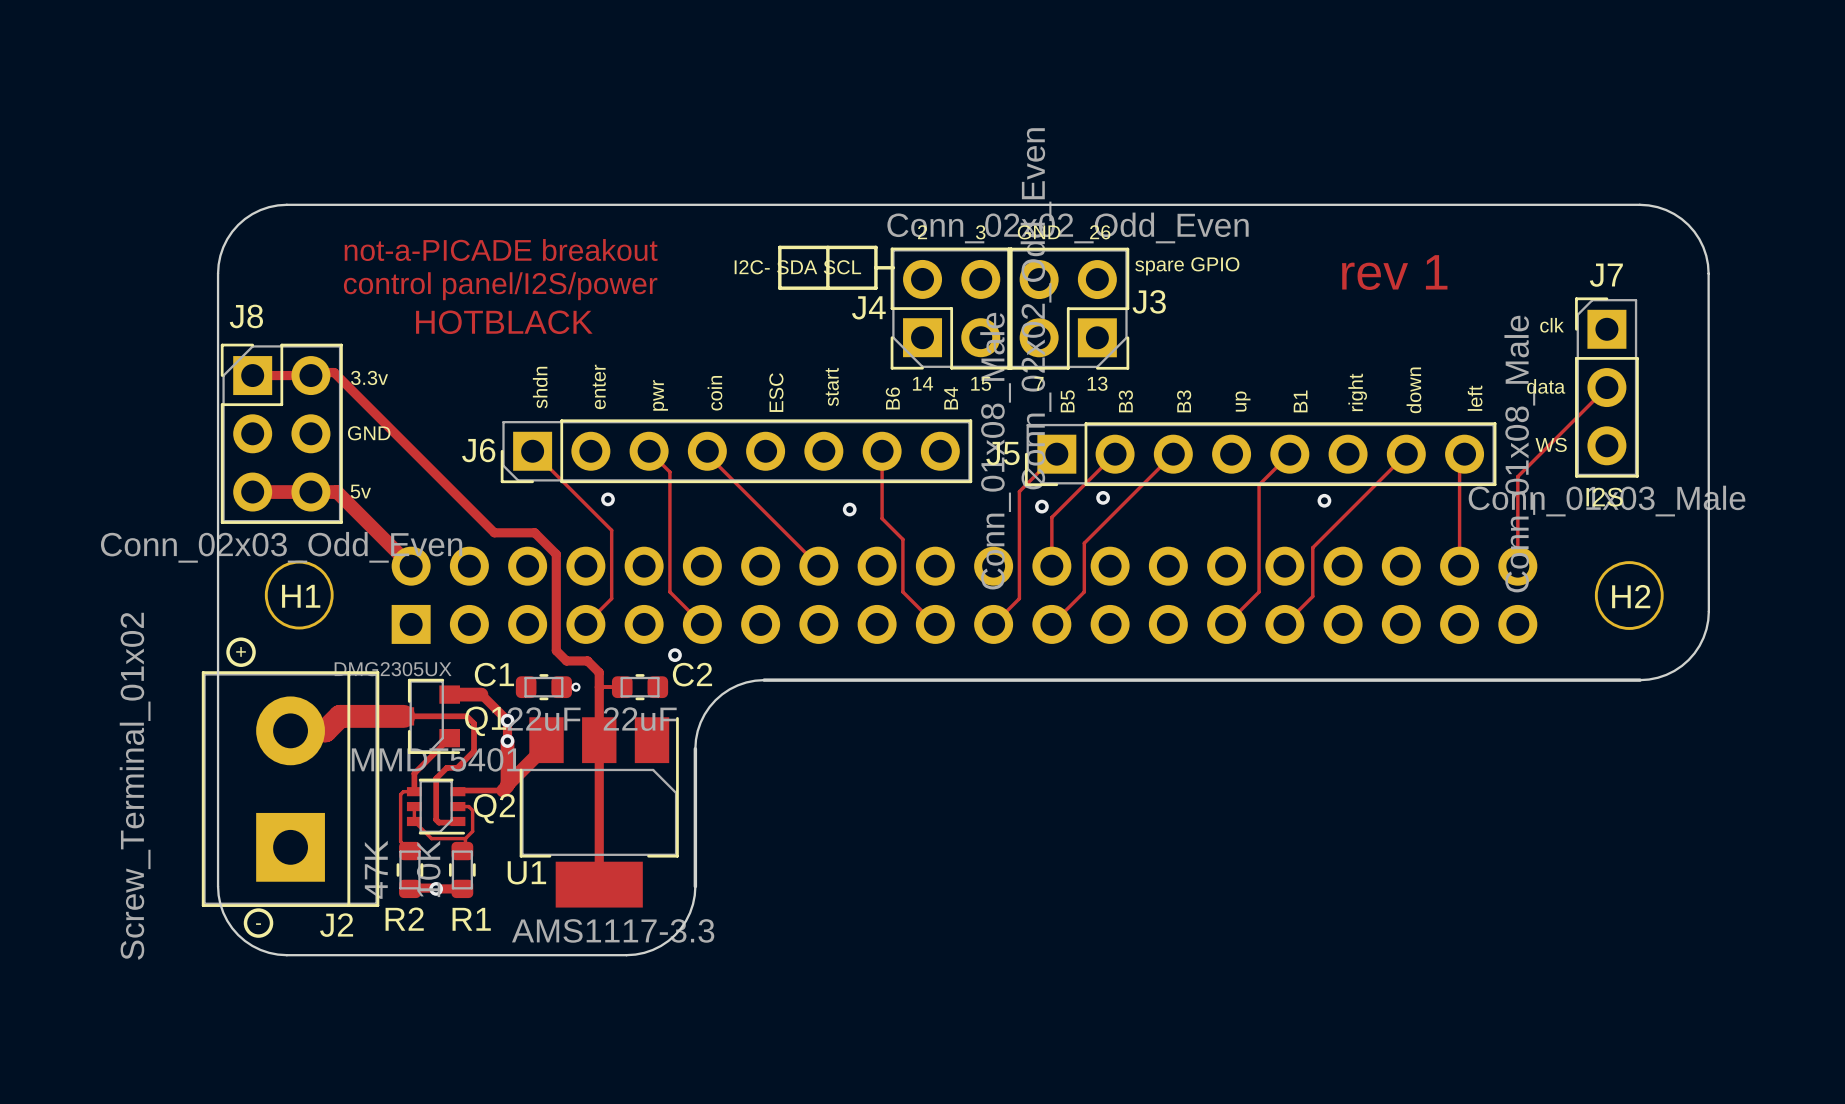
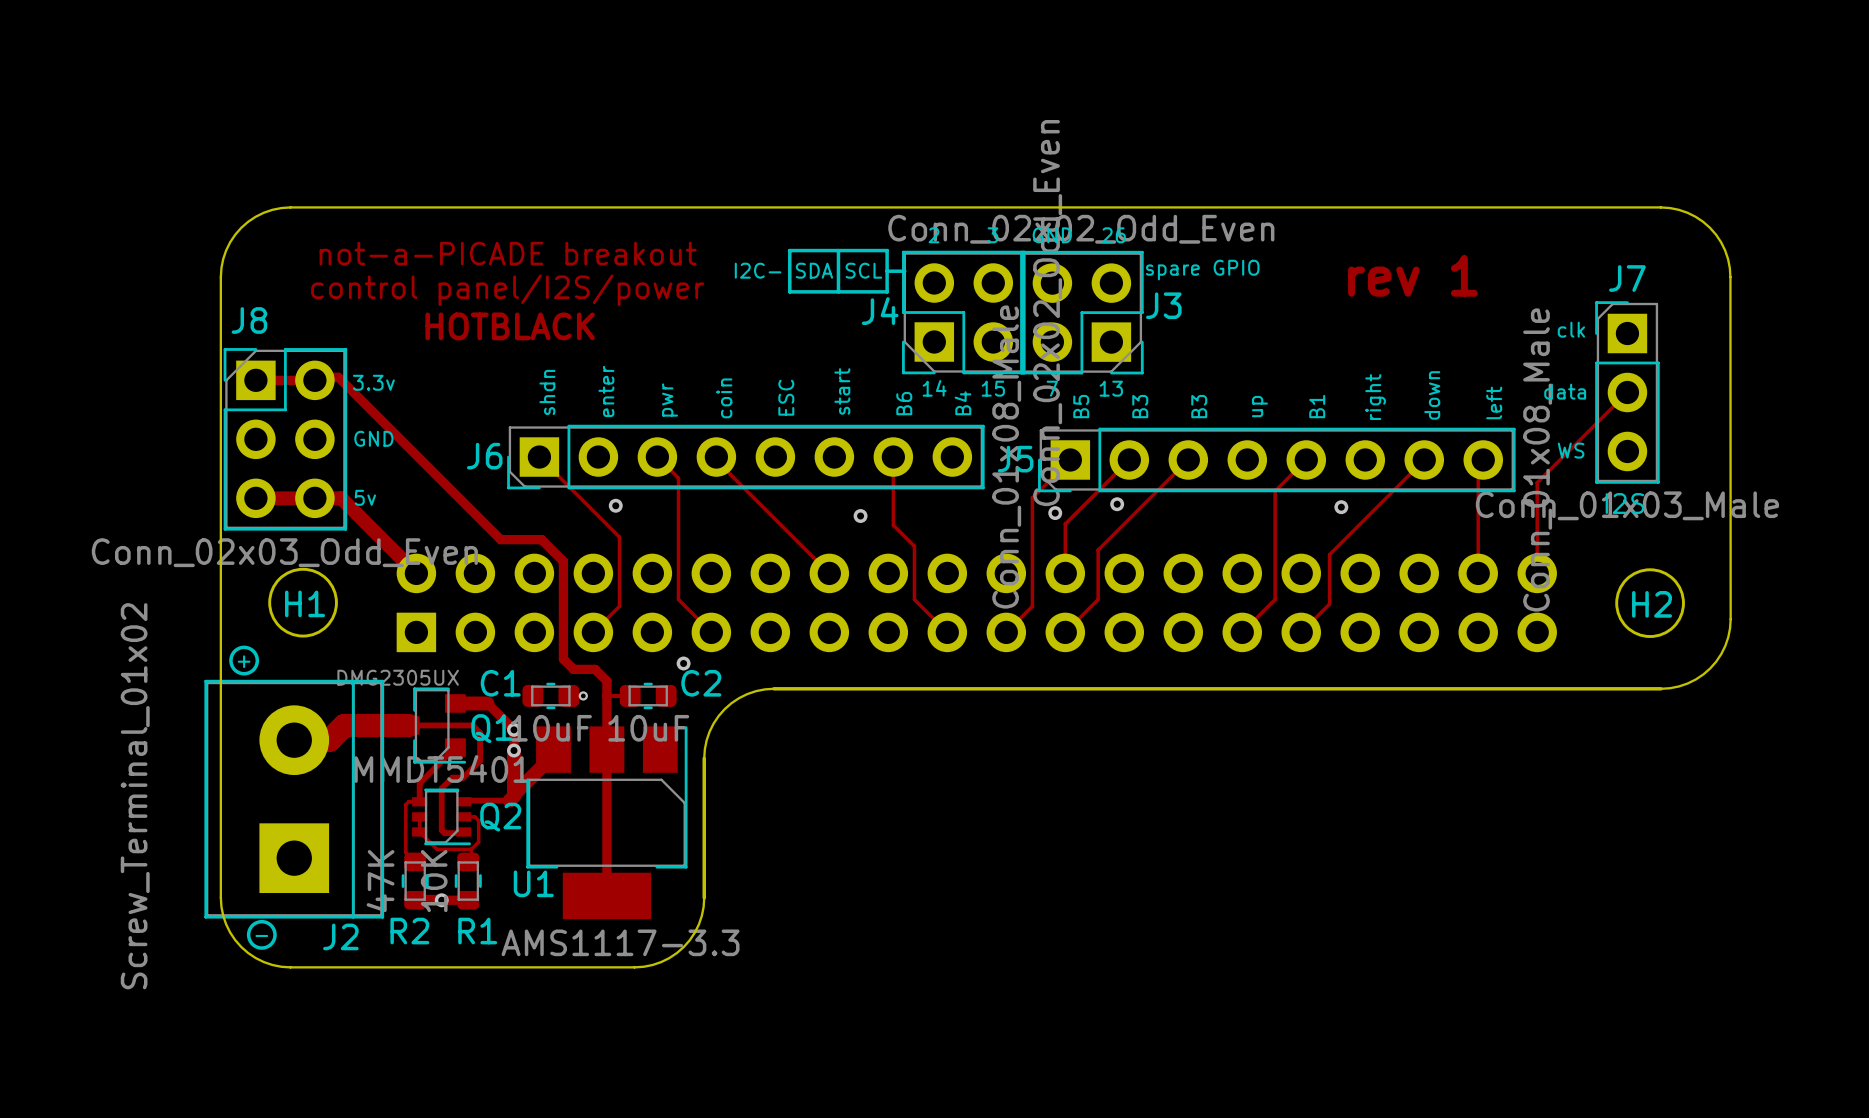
C1 value: 22uF (544, 719) -> 10uF (551, 728)
C2 value: 22uF (640, 719) -> 10uF (648, 728)

